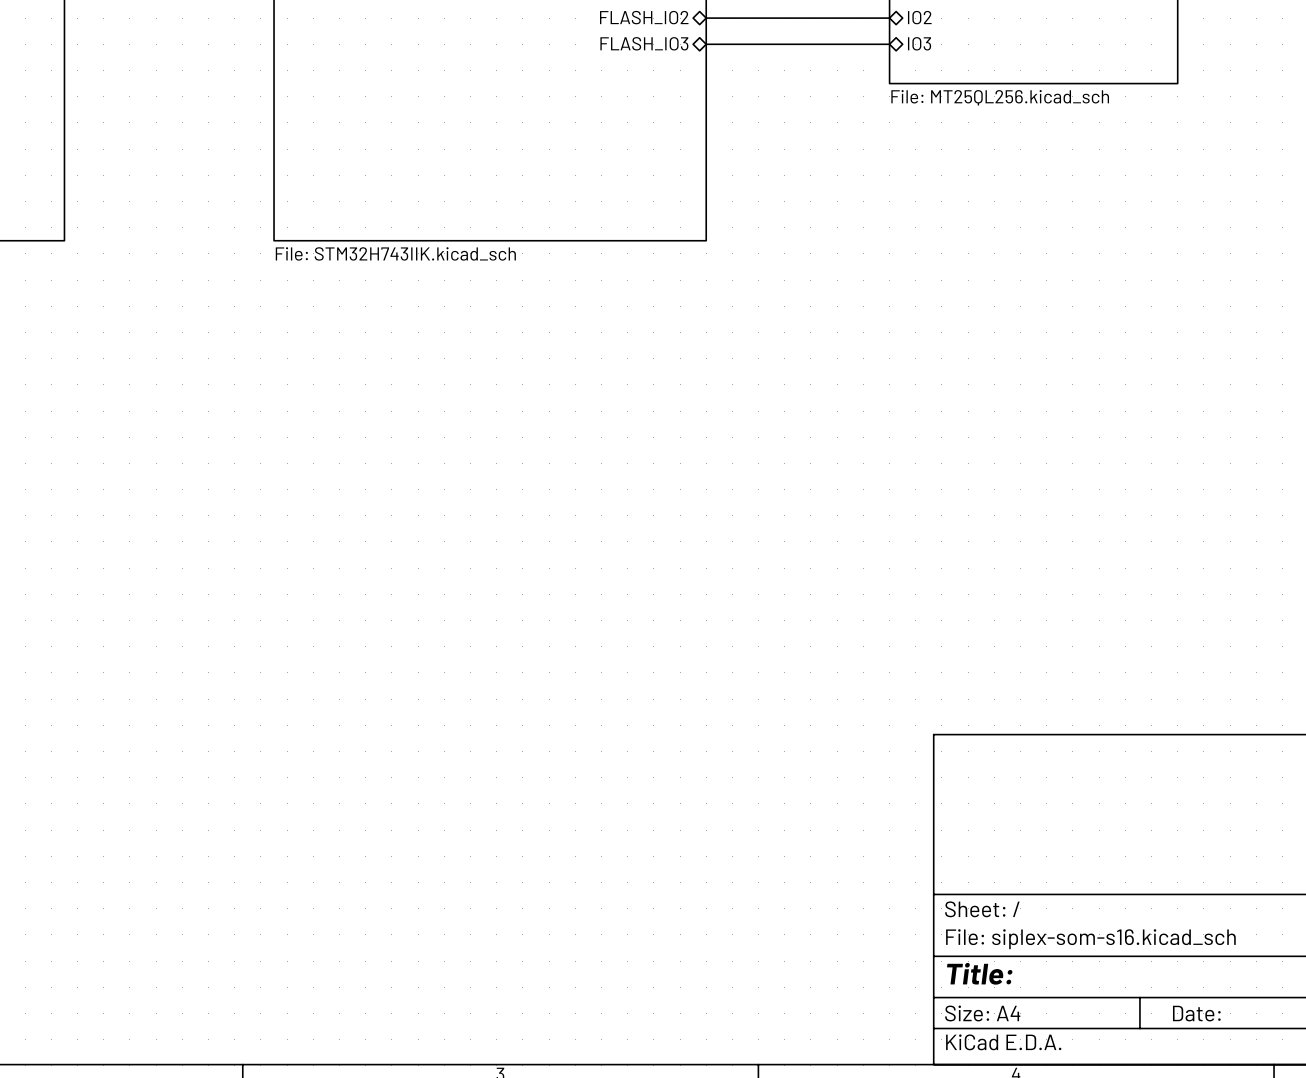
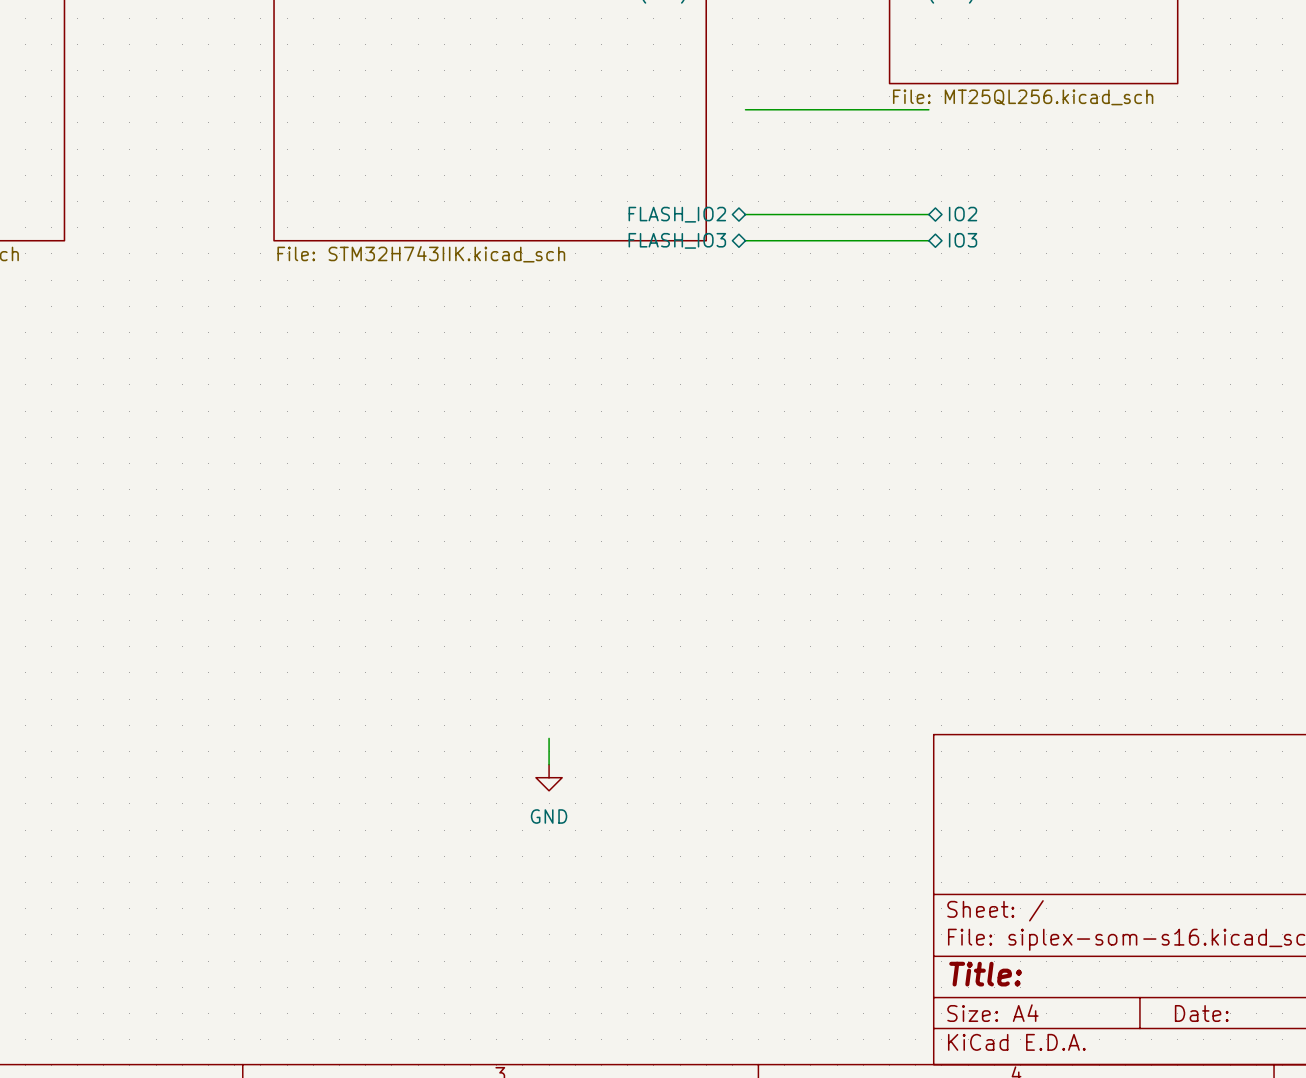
sheet pin position: FLASH_IO2 (644, 17) -> FLASH_IO2 (677, 214)
sheet pin position: IO2 (919, 17) -> IO2 (963, 214)
wire: (706, 18) (889, 18) -> (745, 214) (928, 214)
sheet pin position: FLASH_IO3 (644, 43) -> FLASH_IO3 (677, 240)
sheet pin position: IO3 (919, 43) -> IO3 (963, 240)
wire: (706, 44) (889, 44) -> (745, 240) (928, 240)
wire: none -> (745, 109) (928, 109)
wire: none -> (549, 738) (549, 764)
power symbol: none -> GND (549, 777)

